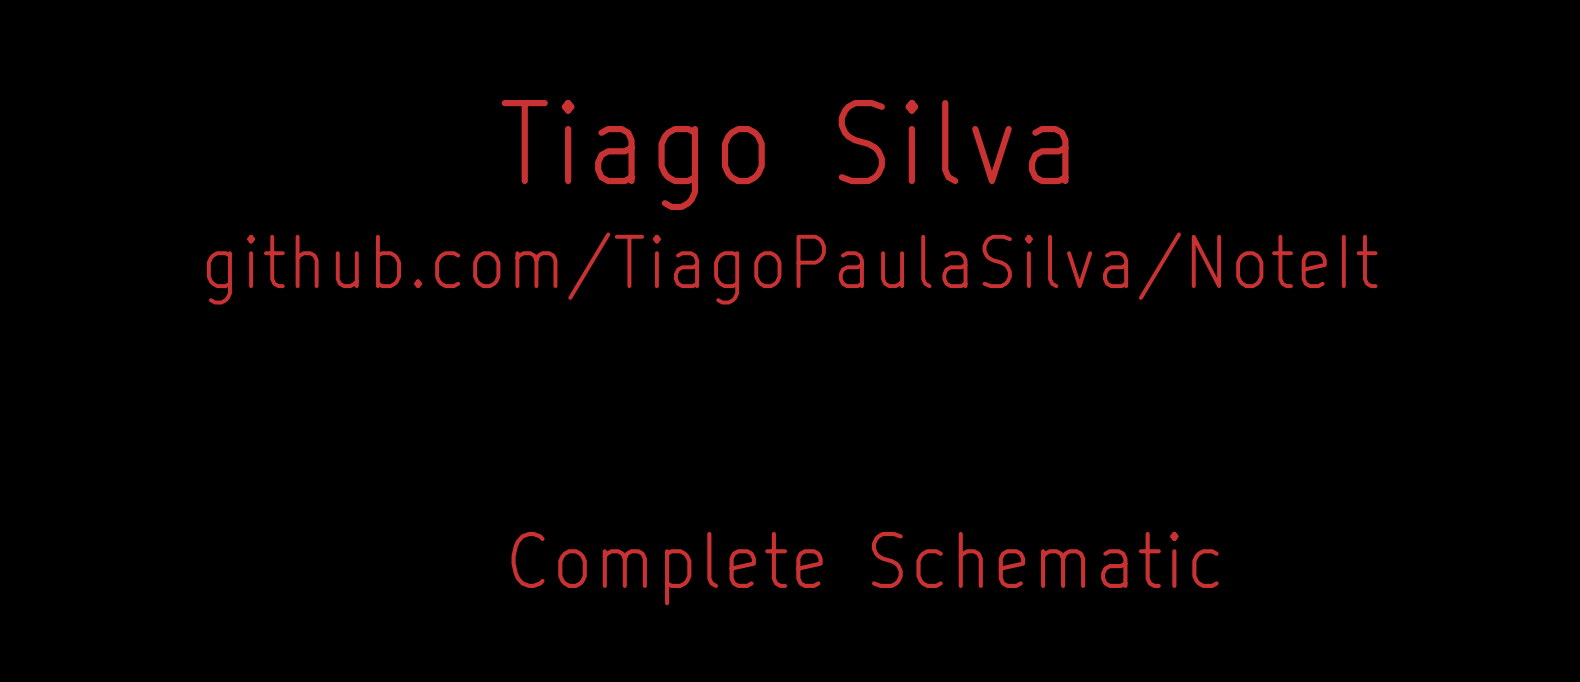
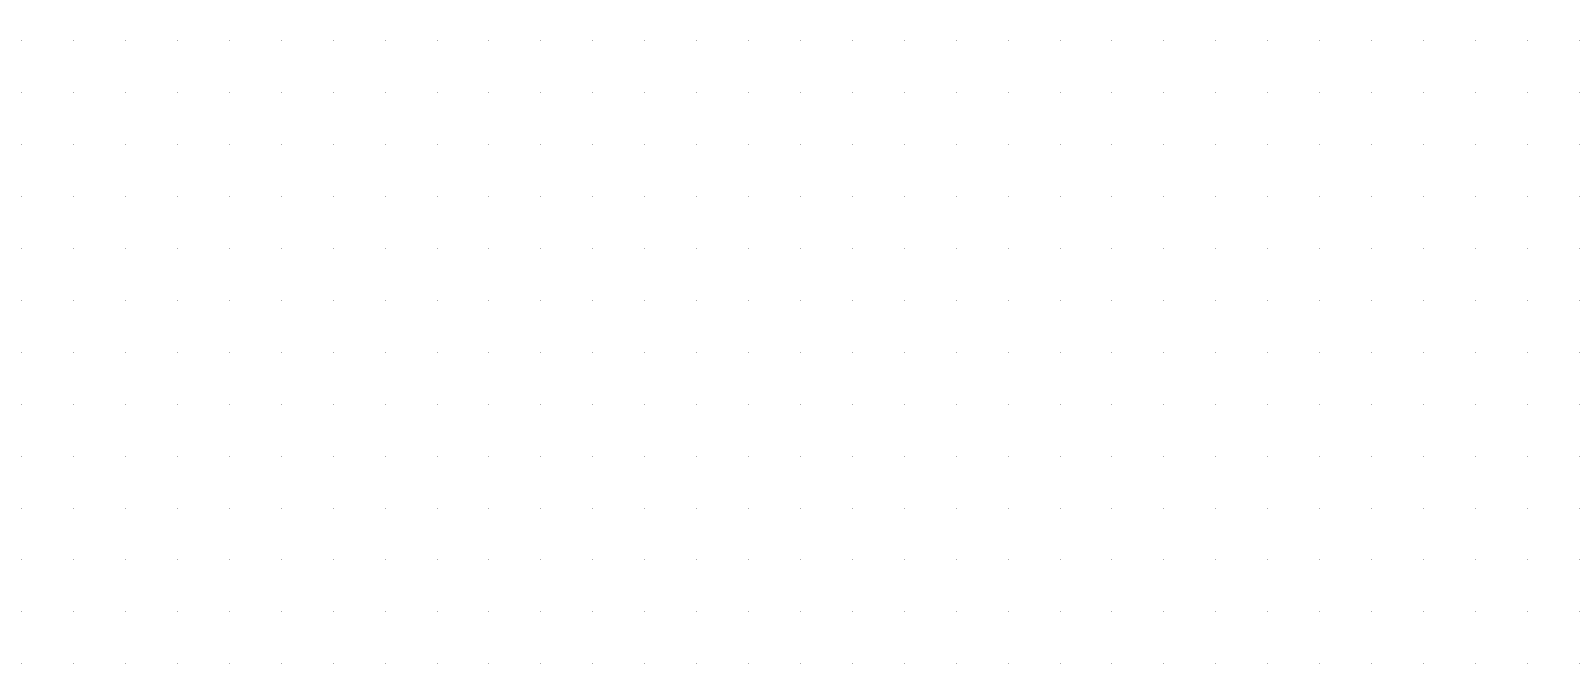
text: Tiago Silva (785, 155) -> none
text: github.com/TiagoPaulaSilva/NoteIt (792, 268) -> none
text: Complete Schematic (865, 568) -> none

